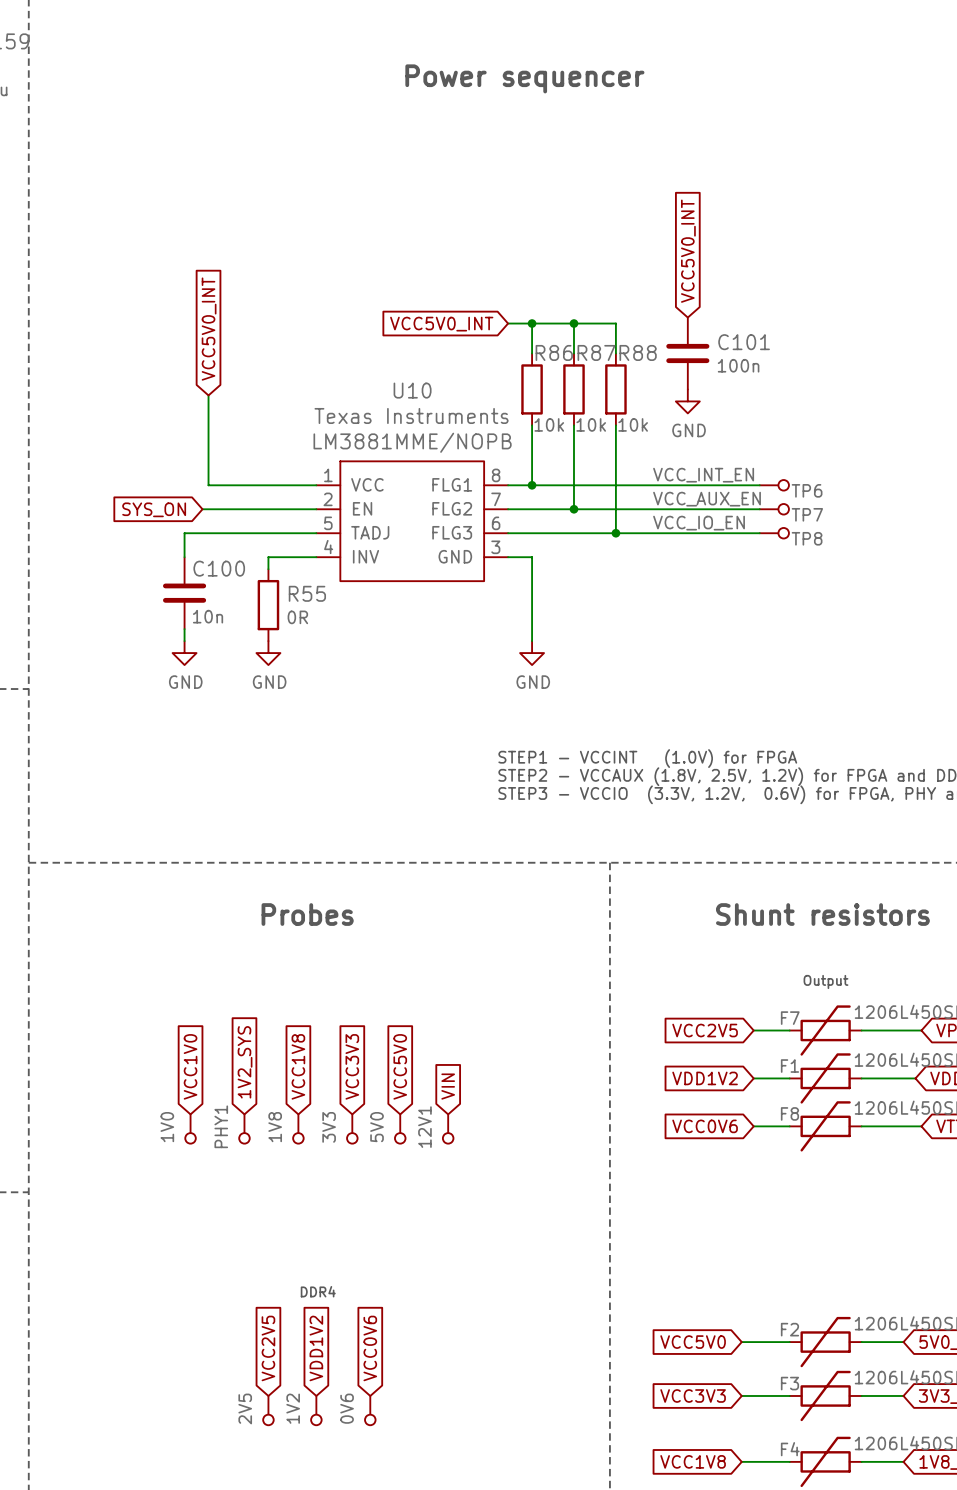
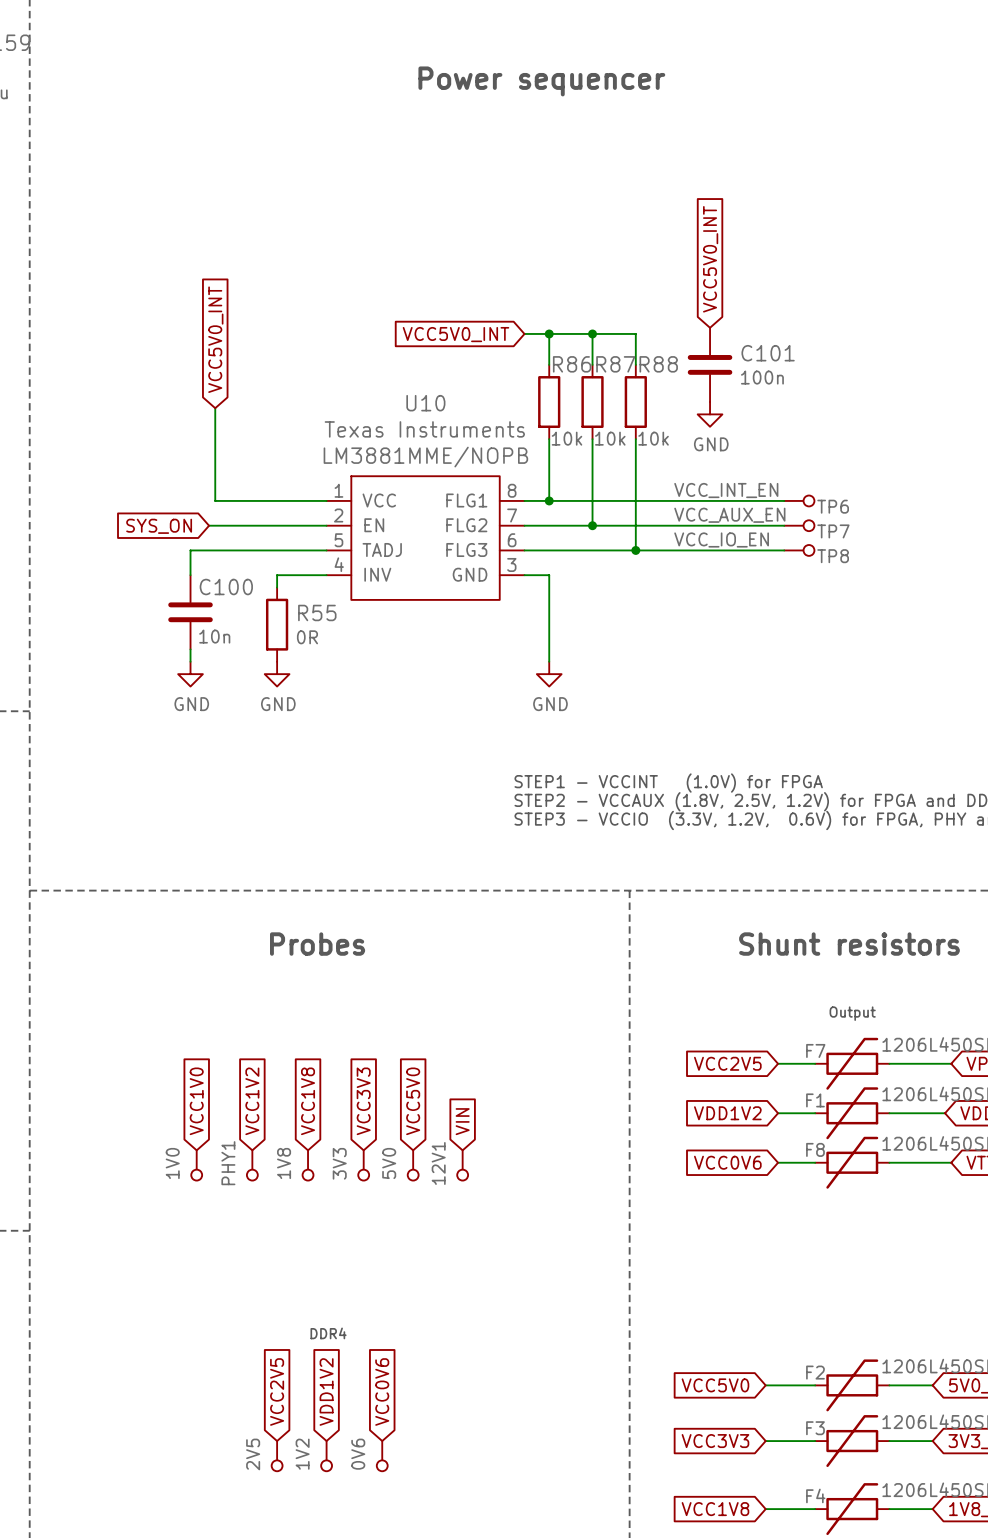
global label: 1V2_SYS (245, 1062) -> VCC1V2 (252, 1101)

